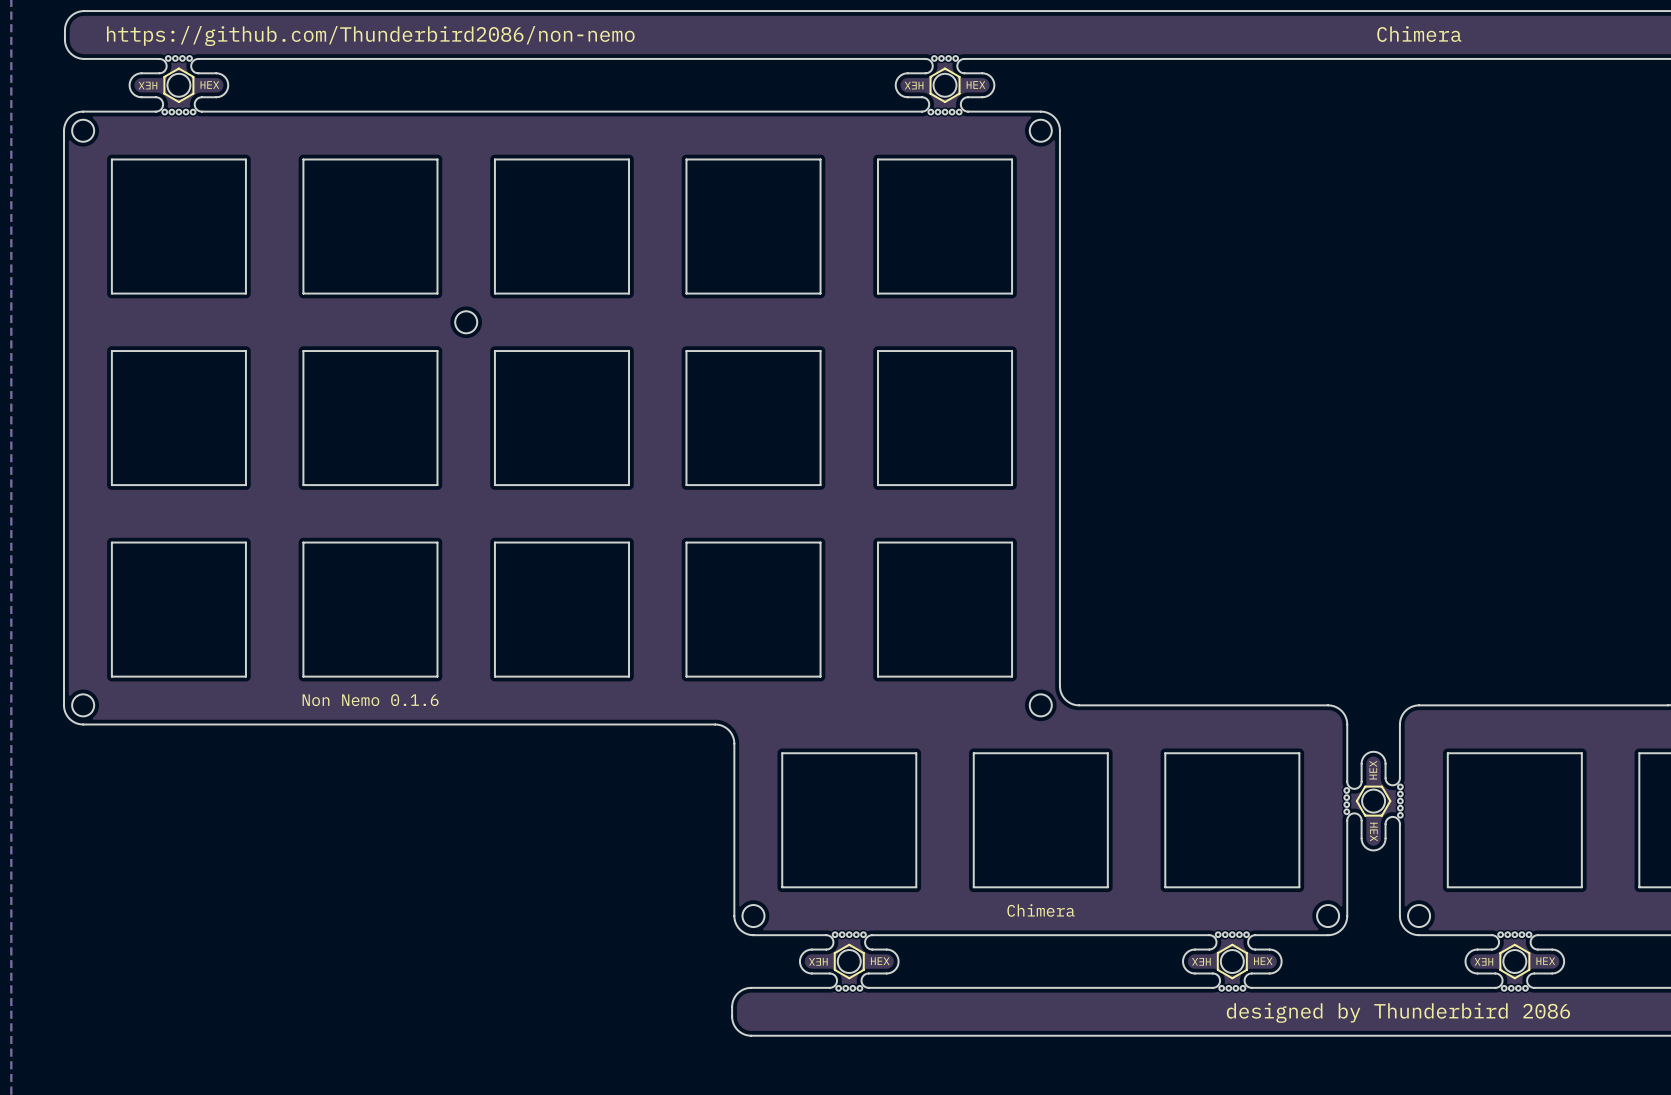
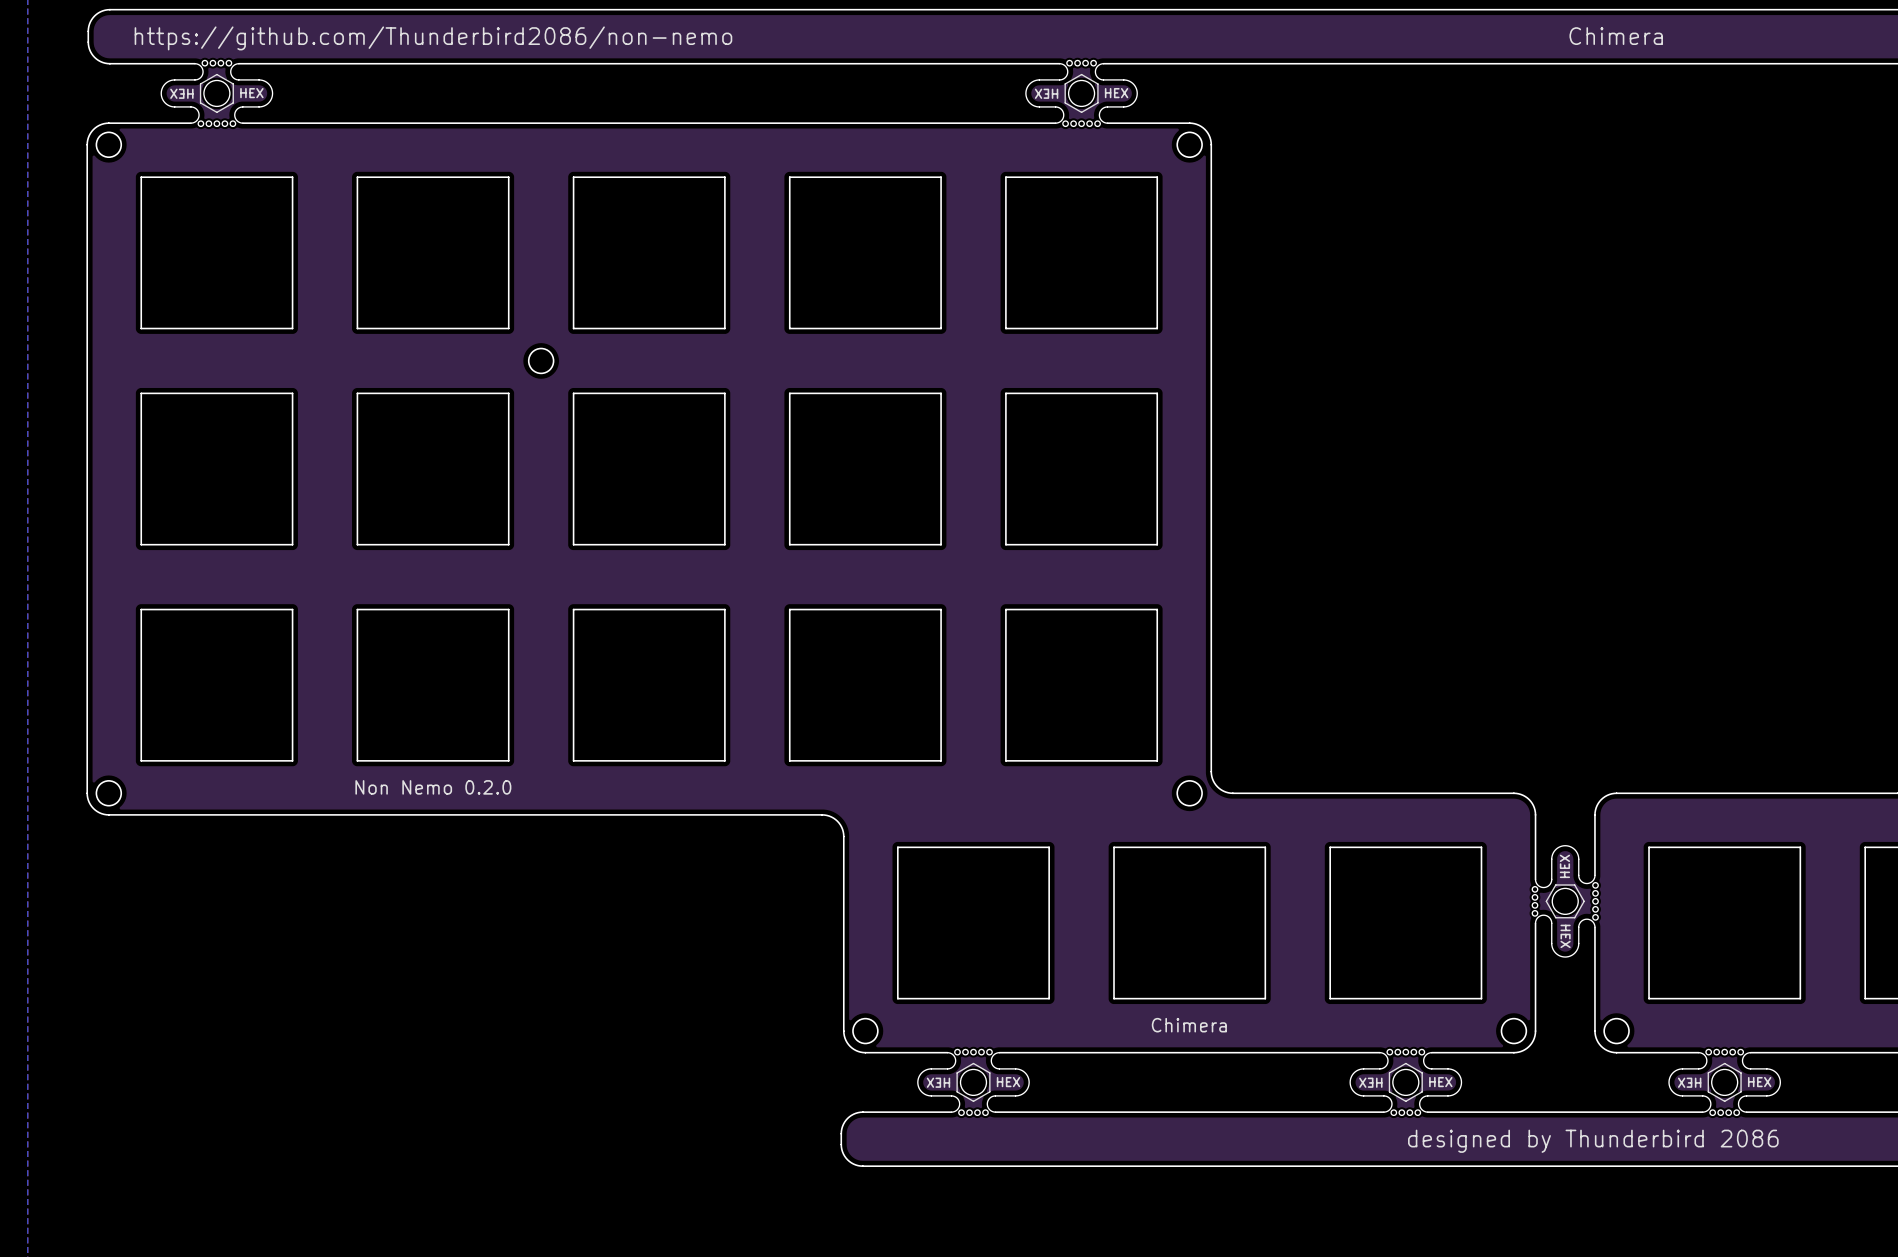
text: Non Nemo 0.1.6 (370, 700) -> Non Nemo 0.2.0 (433, 787)

